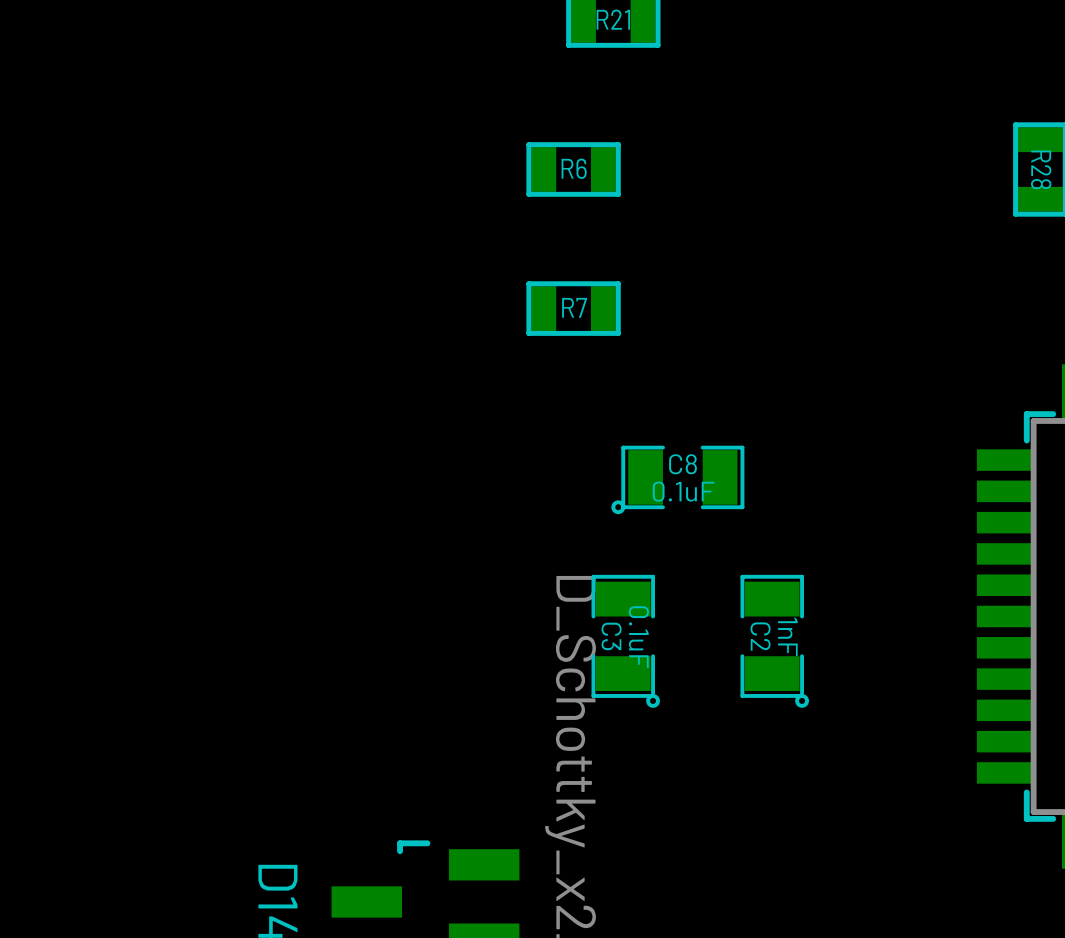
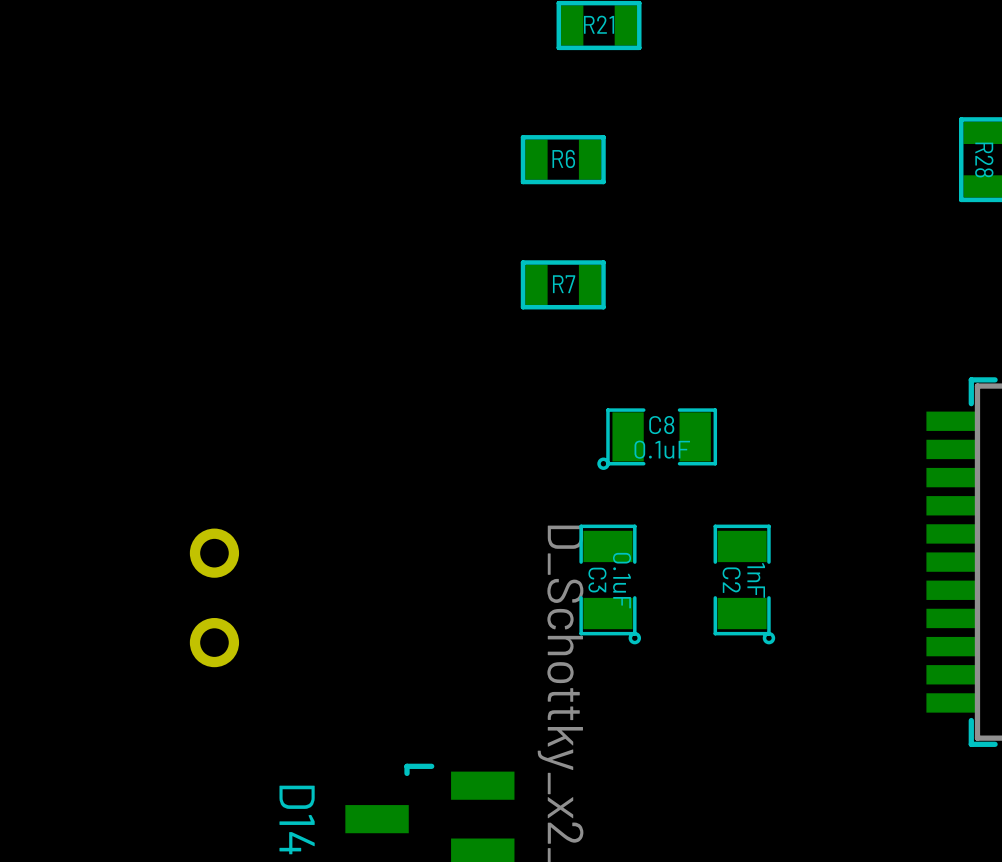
part: none -> (214, 597)

